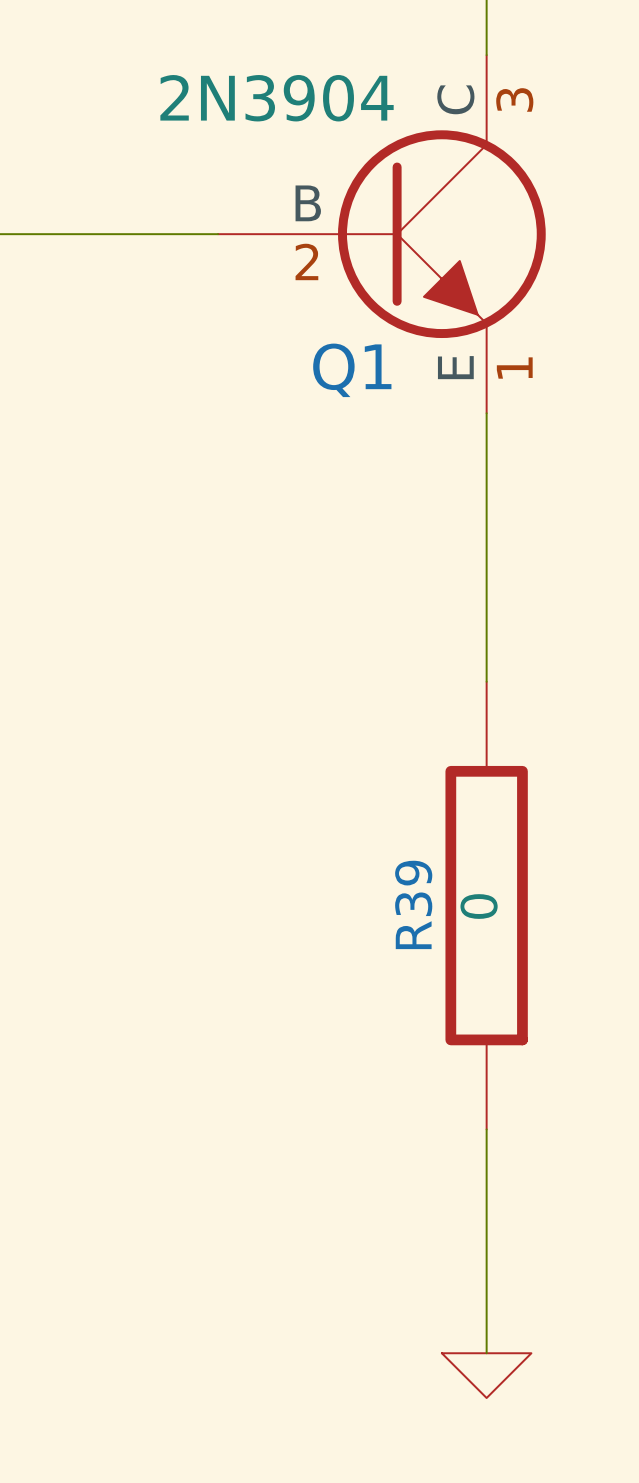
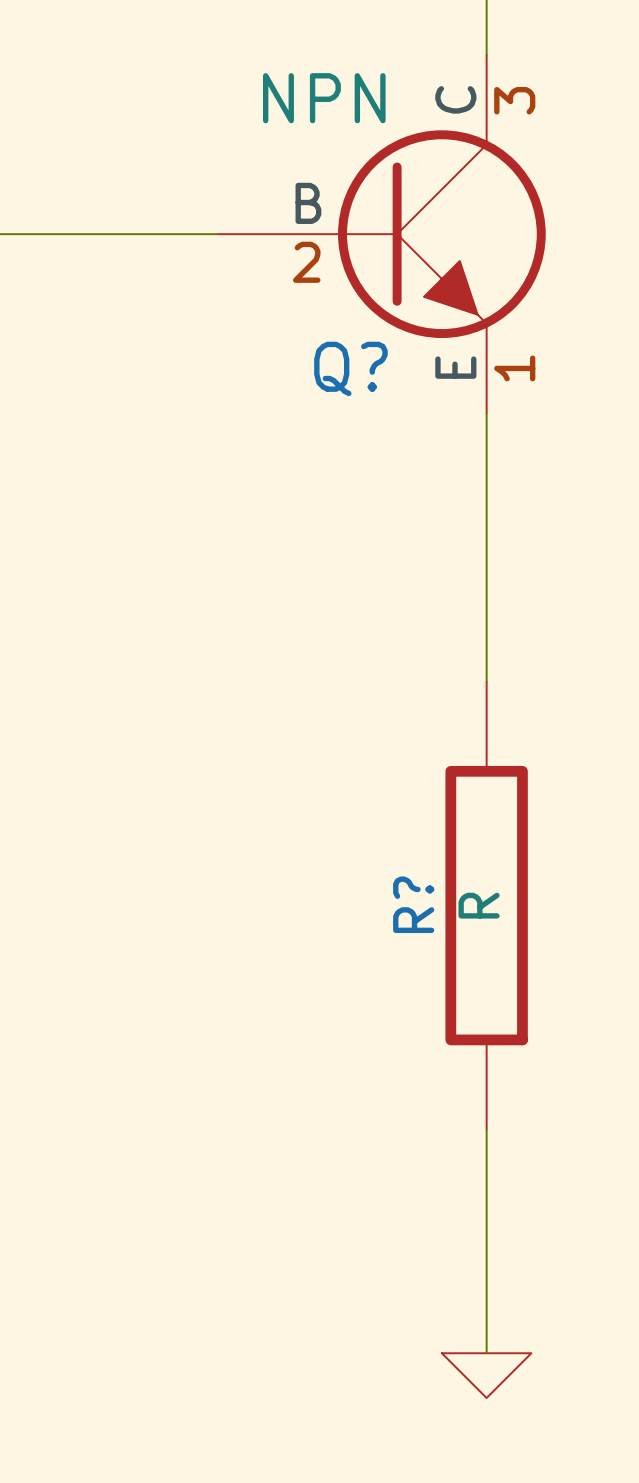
Q1 value: 2N3904 (277, 98) -> NPN (324, 98)
Q1 name: Q1 (352, 370) -> Q? (350, 368)
R39 name: R39 (413, 904) -> R? (413, 904)
R39 value: 0 (479, 906) -> R (479, 905)

